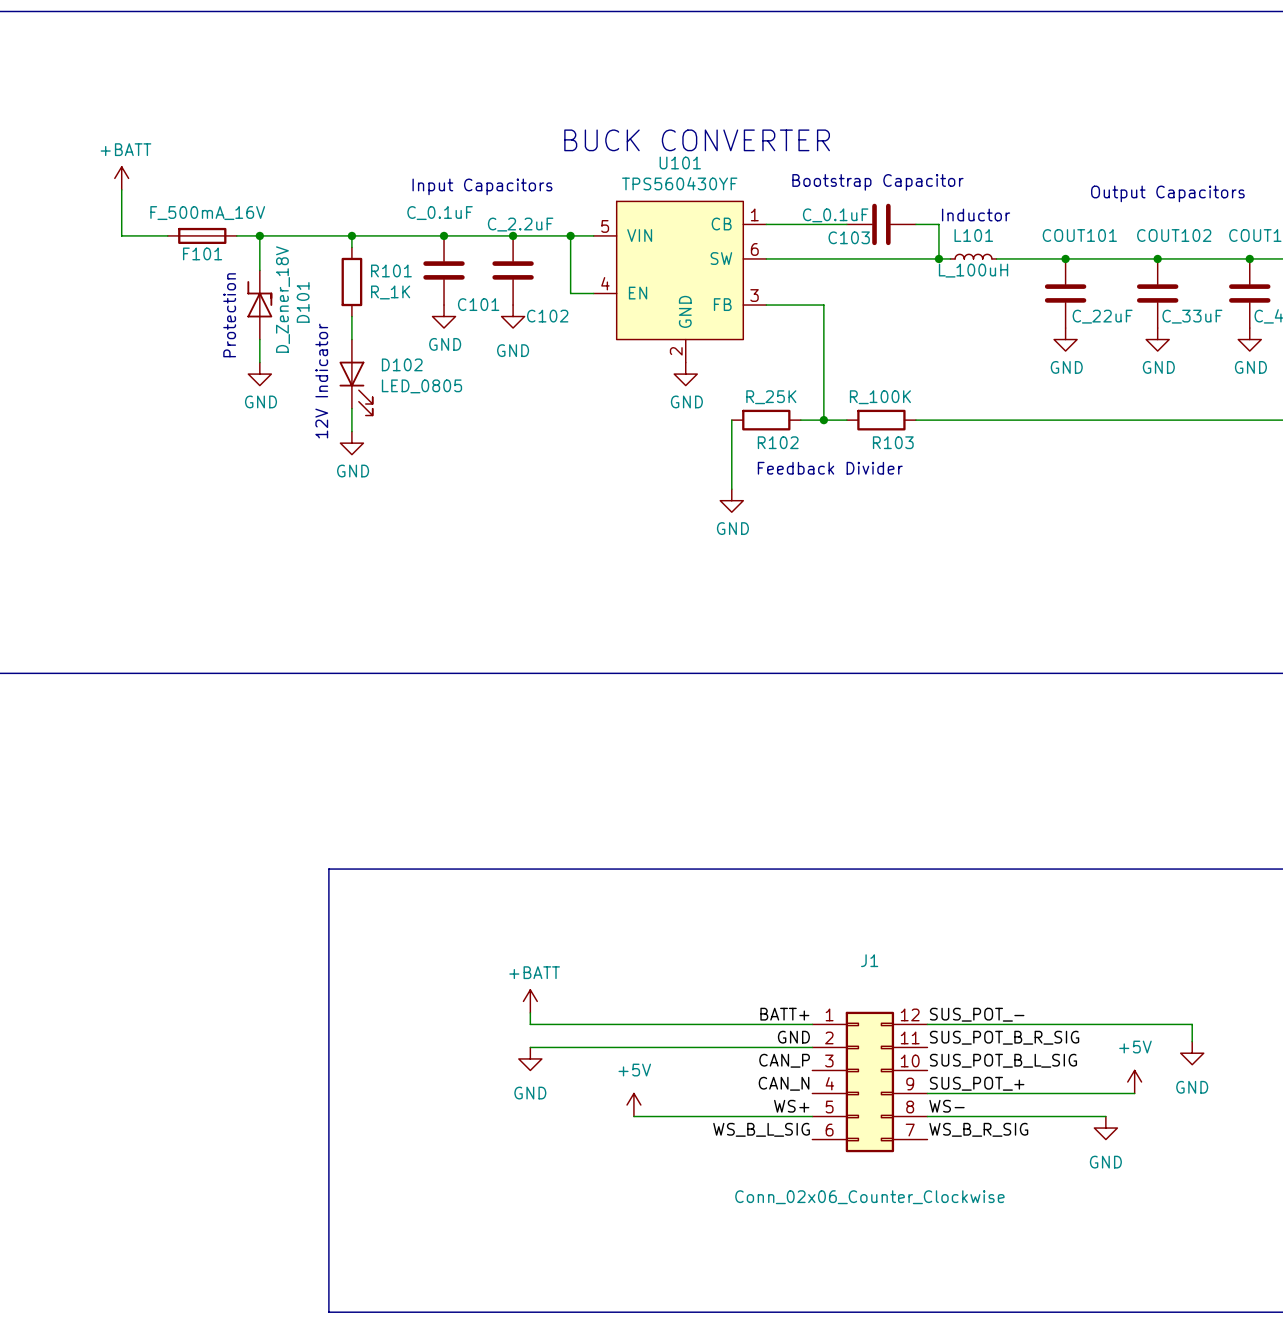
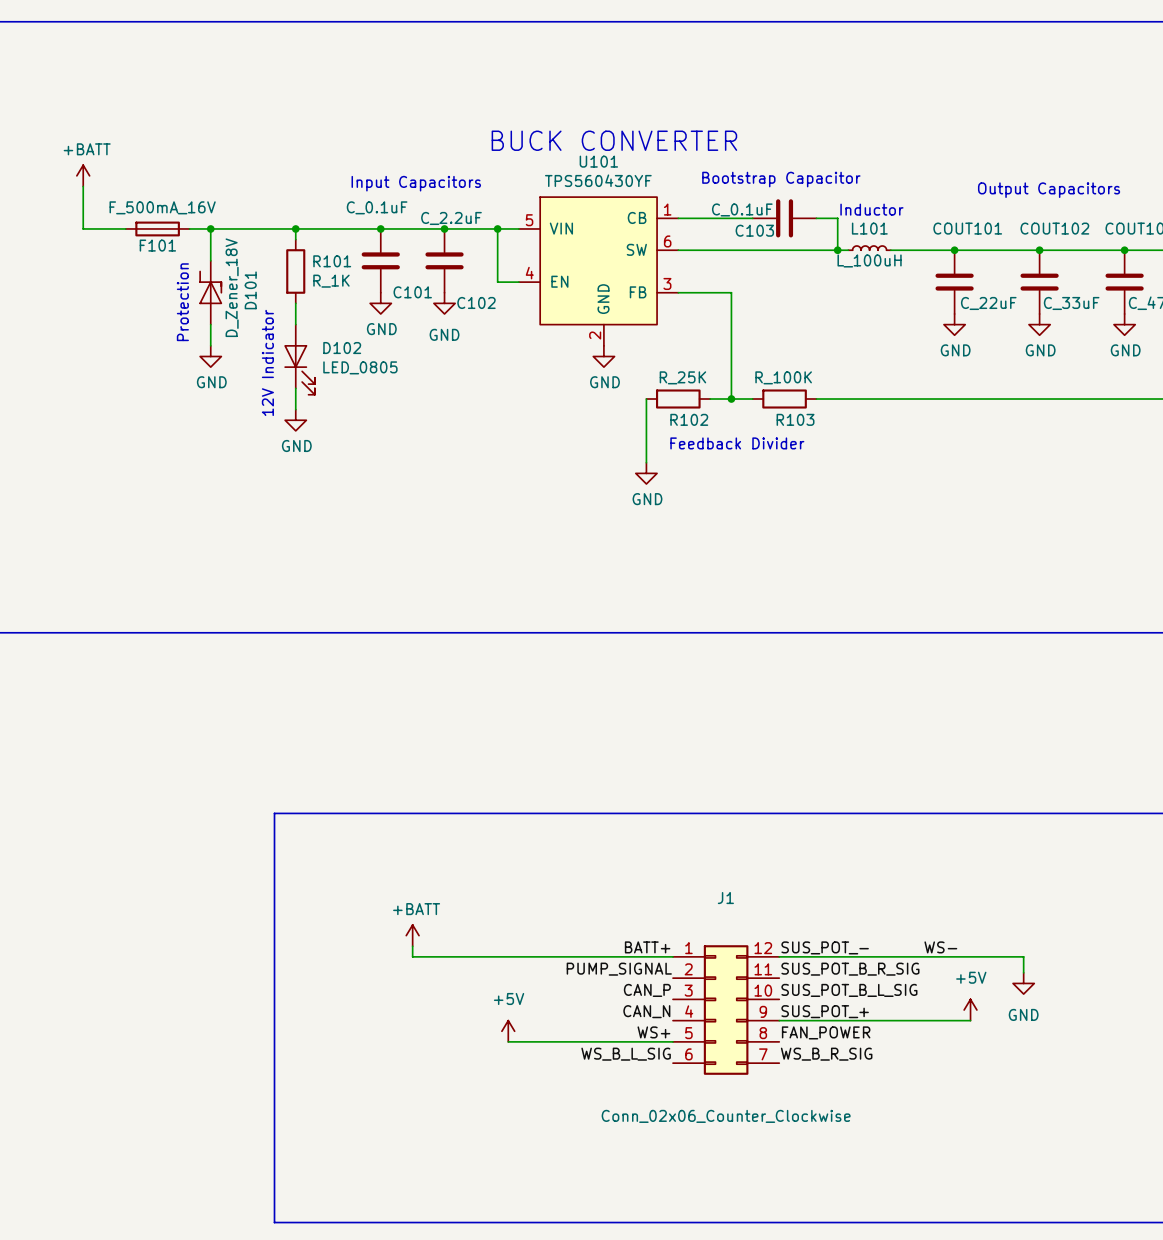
power symbol position: +BATT (530, 1001) -> +BATT (412, 935)
wire: (530, 1012) (530, 1024) -> (412, 946) (412, 956) (460, 956)
label position: BATT+ (784, 1014) -> BATT+ (647, 947)
label position: SUS_POT_- (977, 1014) -> SUS_POT_- (825, 947)
wire: (1140, 1024) (1192, 1024) (1192, 1041) -> (1023, 956) (1023, 972)
label: none -> PUMP_SIGNAL (619, 969)
label: GND (793, 1037) -> none
label position: SUS_POT_B_R_SIG (1004, 1037) -> SUS_POT_B_R_SIG (850, 969)
wire: (530, 1047) (812, 1047) -> none
power symbol: none -> GND (1023, 983)
power symbol: GND (1192, 1053) -> none
power symbol: GND (530, 1058) -> none
label position: CAN_P (784, 1060) -> CAN_P (647, 990)
label position: SUS_POT_B_L_SIG (1003, 1060) -> SUS_POT_B_L_SIG (849, 990)
J1 position: (869, 1081) -> (726, 1010)
power symbol position: +5V (1134, 1081) -> +5V (970, 1010)
label position: CAN_N (784, 1083) -> CAN_N (646, 1011)
label position: SUS_POT_+ (977, 1083) -> SUS_POT_+ (825, 1011)
wire: (1082, 1093) (1134, 1093) -> none
power symbol position: +5V (633, 1105) -> +5V (508, 1031)
label position: WS+ (791, 1106) -> WS+ (653, 1032)
label: none -> FAN_POWER (826, 1032)
label position: WS- (947, 1106) -> WS- (940, 947)
wire: none -> (508, 1041) (556, 1041)
wire: (927, 1116) (1105, 1116) -> none
power symbol: GND (1105, 1128) -> none
label position: WS_B_L_SIG (761, 1129) -> WS_B_L_SIG (626, 1054)
label position: WS_B_R_SIG (978, 1129) -> WS_B_R_SIG (826, 1054)

